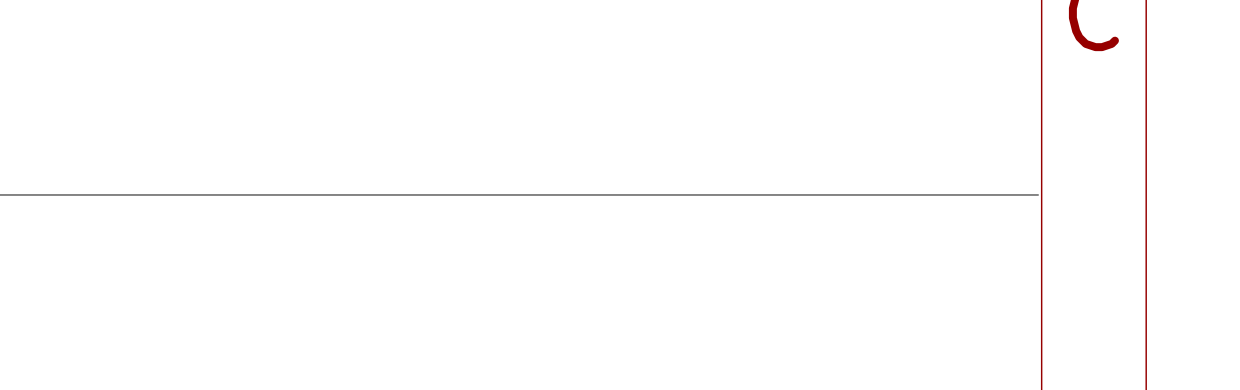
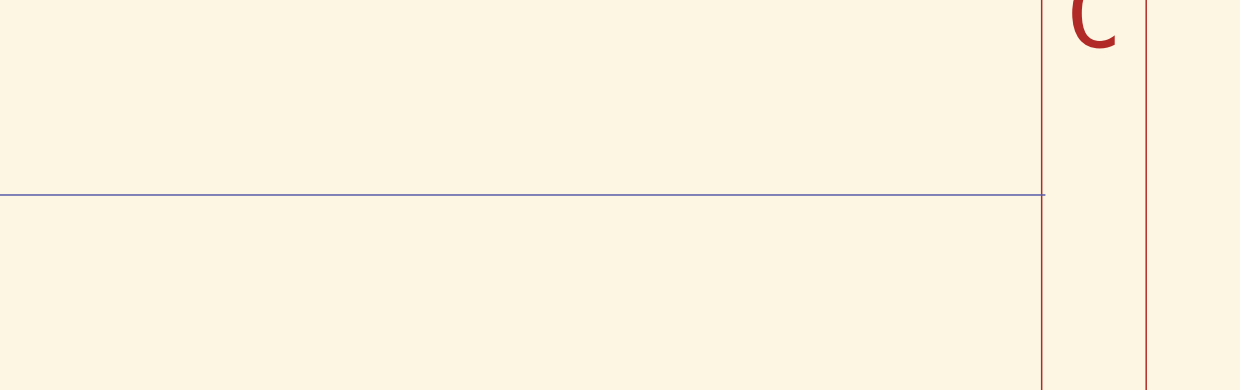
line: none -> (1038, 194) (1044, 194)

